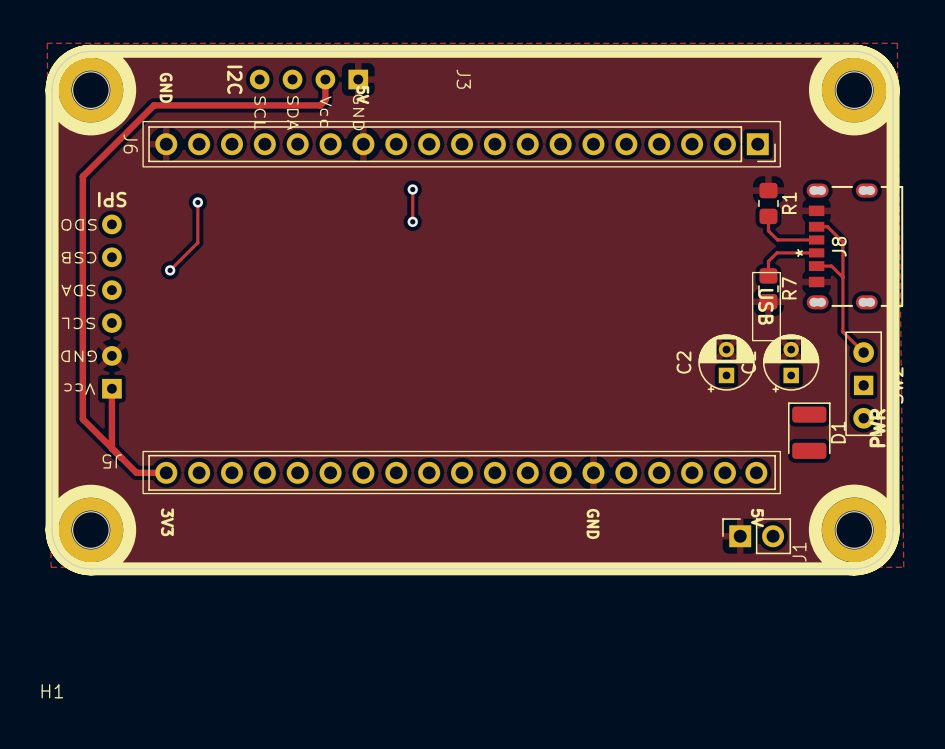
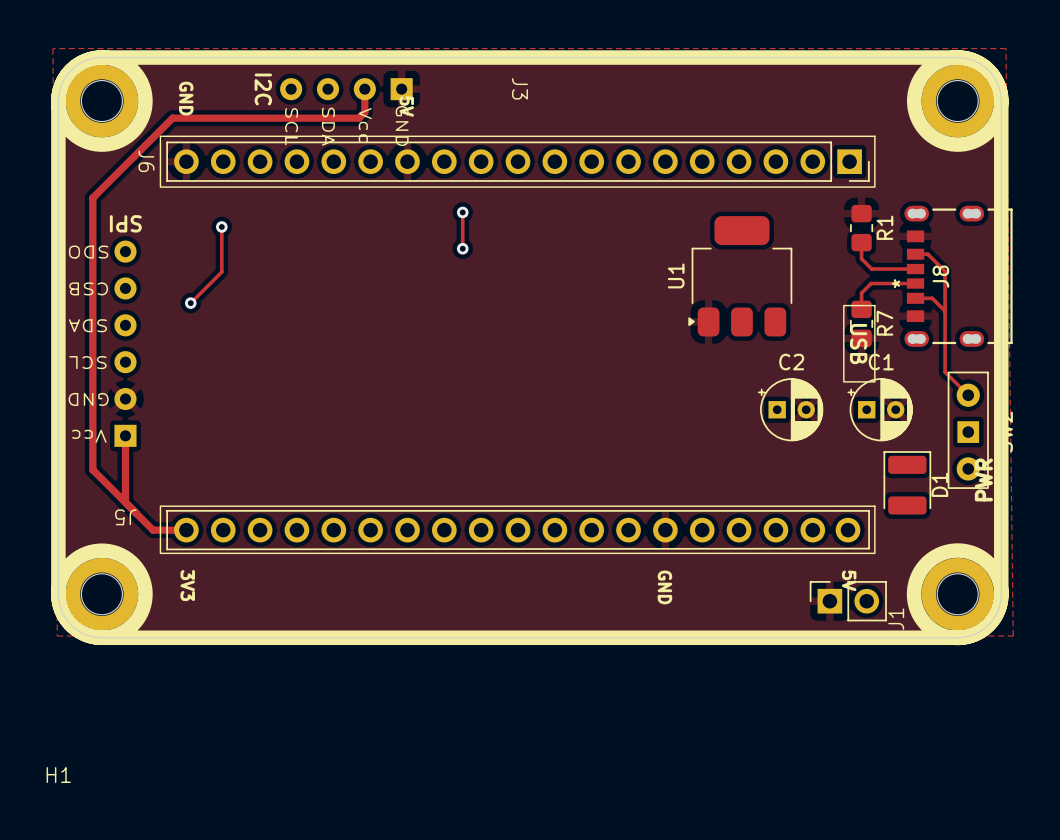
U1: none -> (740, 276)
C2 rotation: 0° (726, 363) -> 90° clockwise (790, 409)
C1 rotation: 0° (791, 363) -> 90° clockwise (880, 409)

